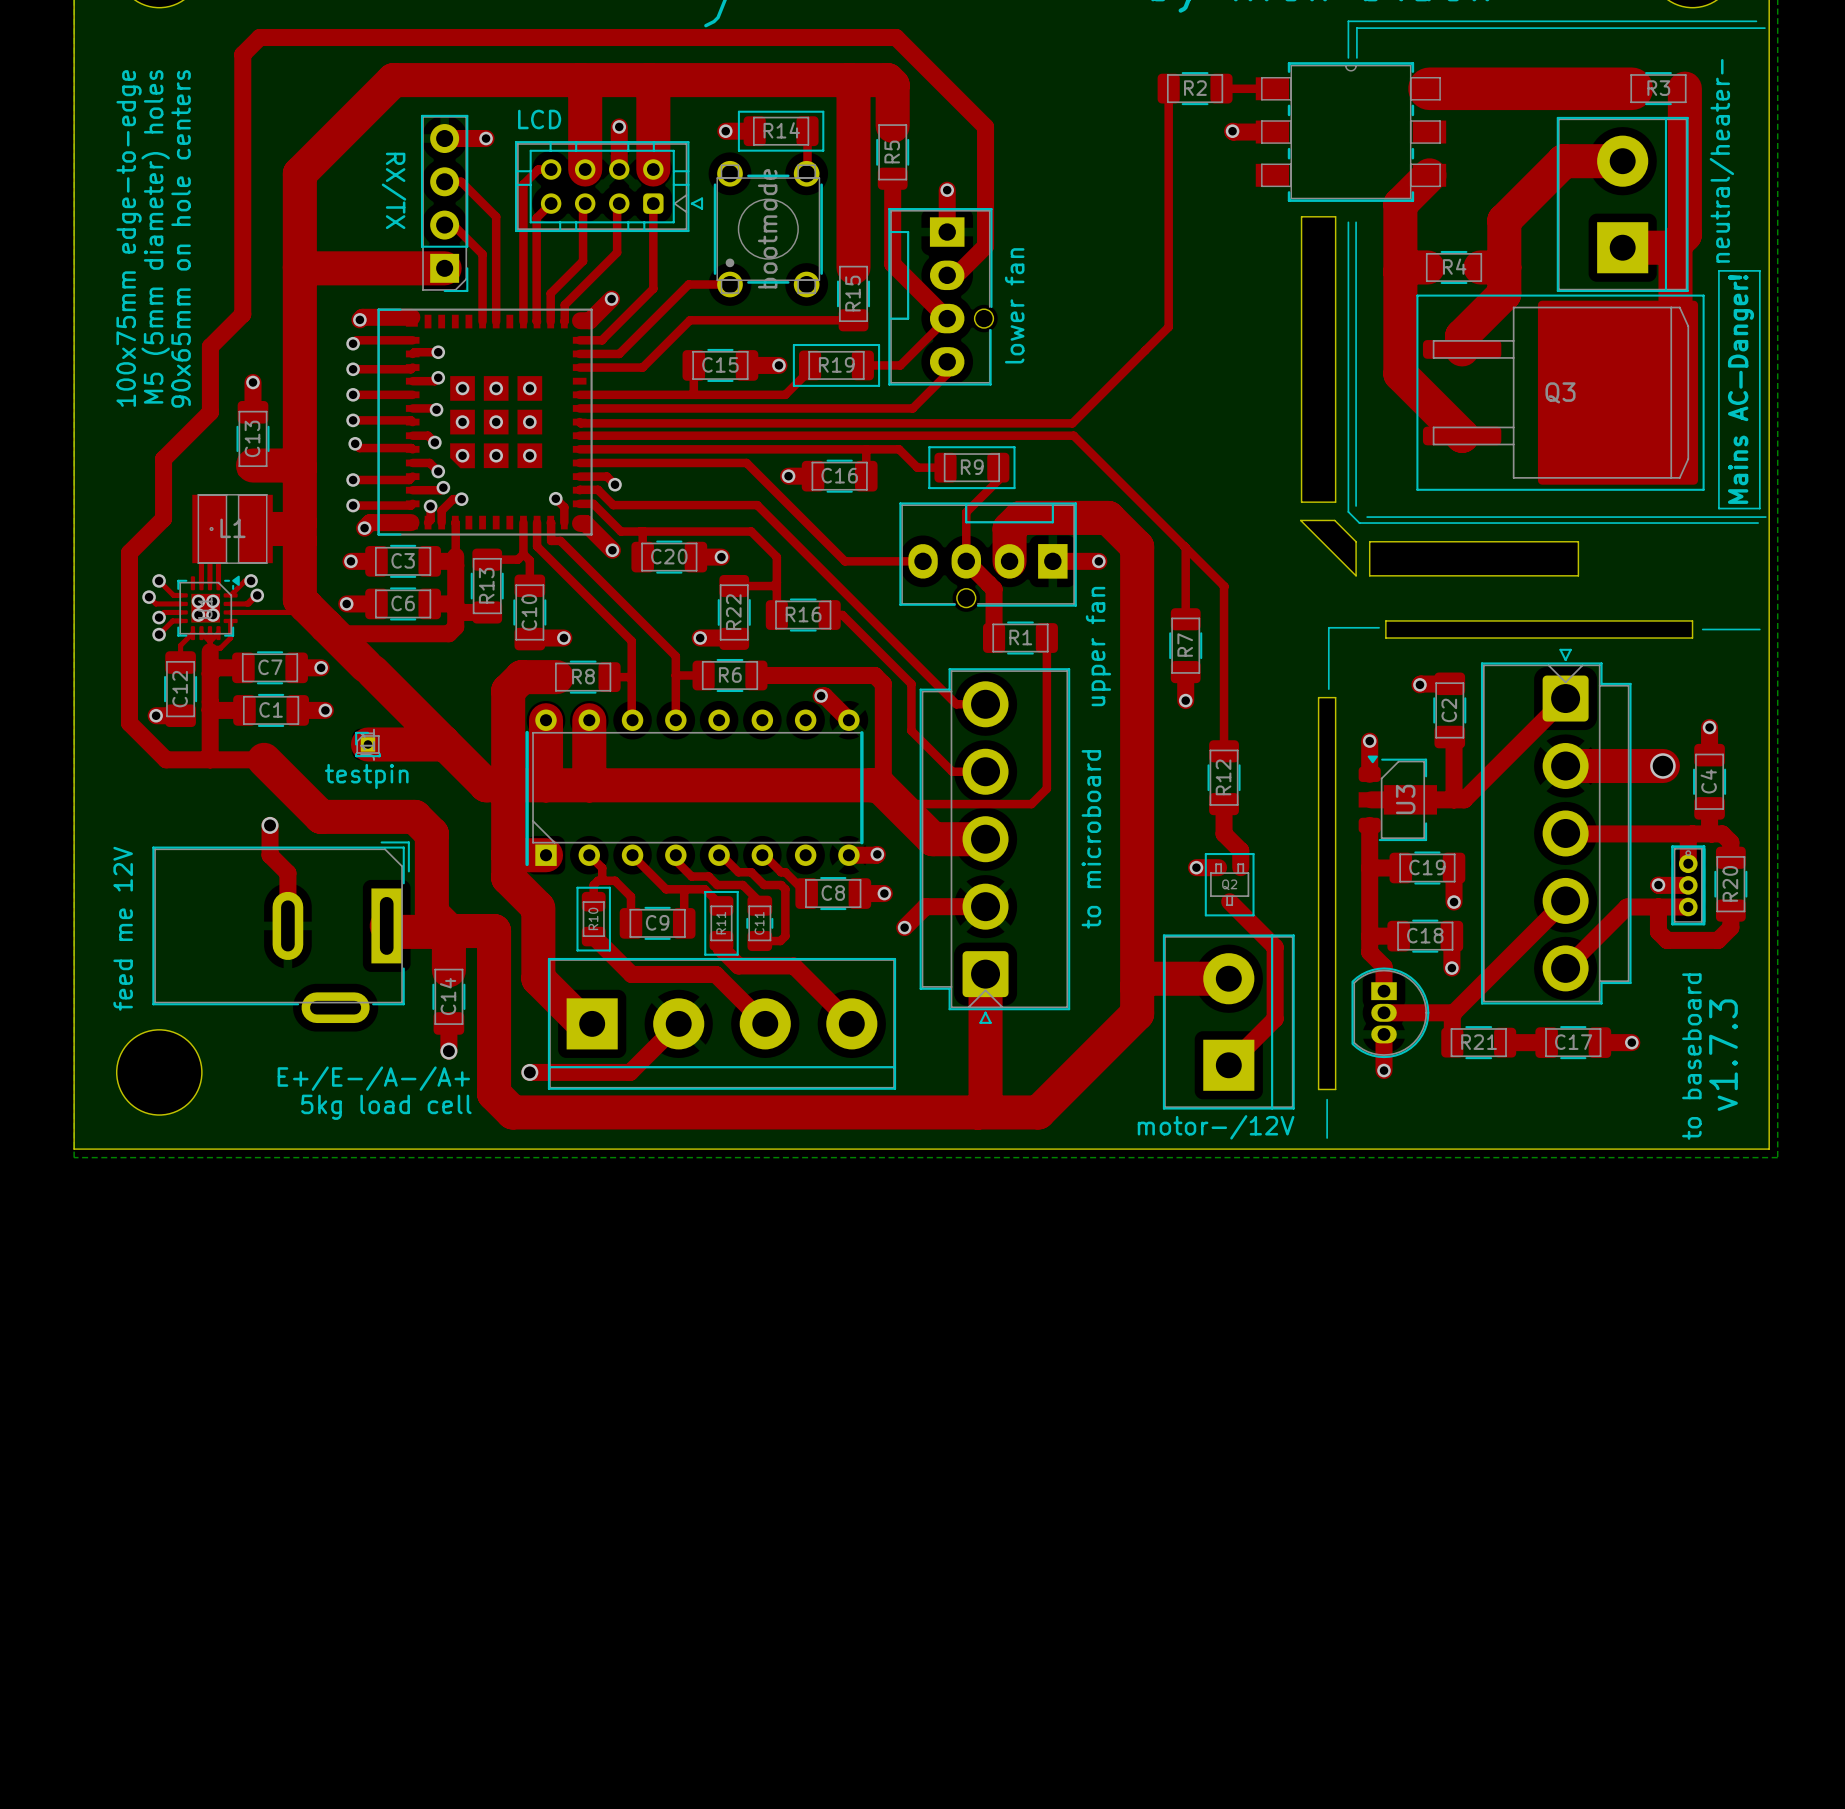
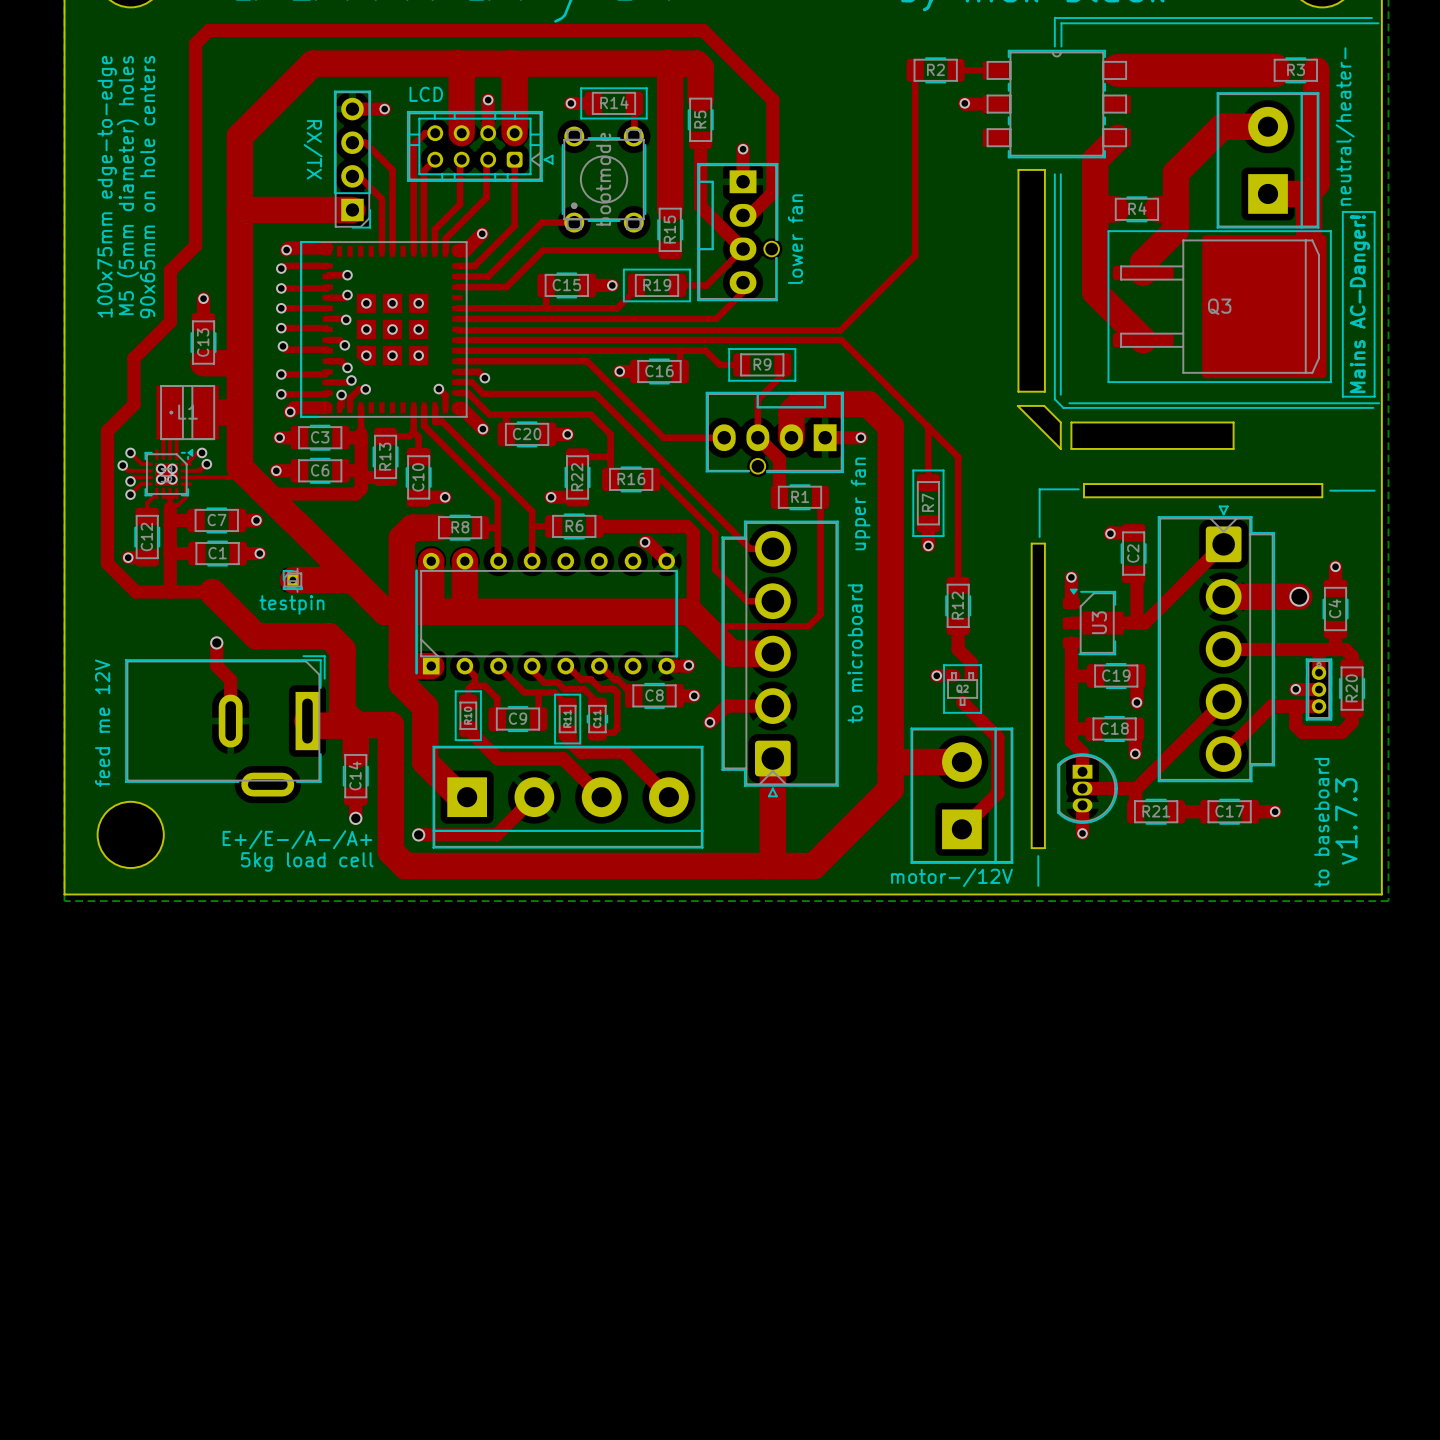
R7 footprint: [1169, 608, 1203, 684] -> [912, 469, 945, 537]

